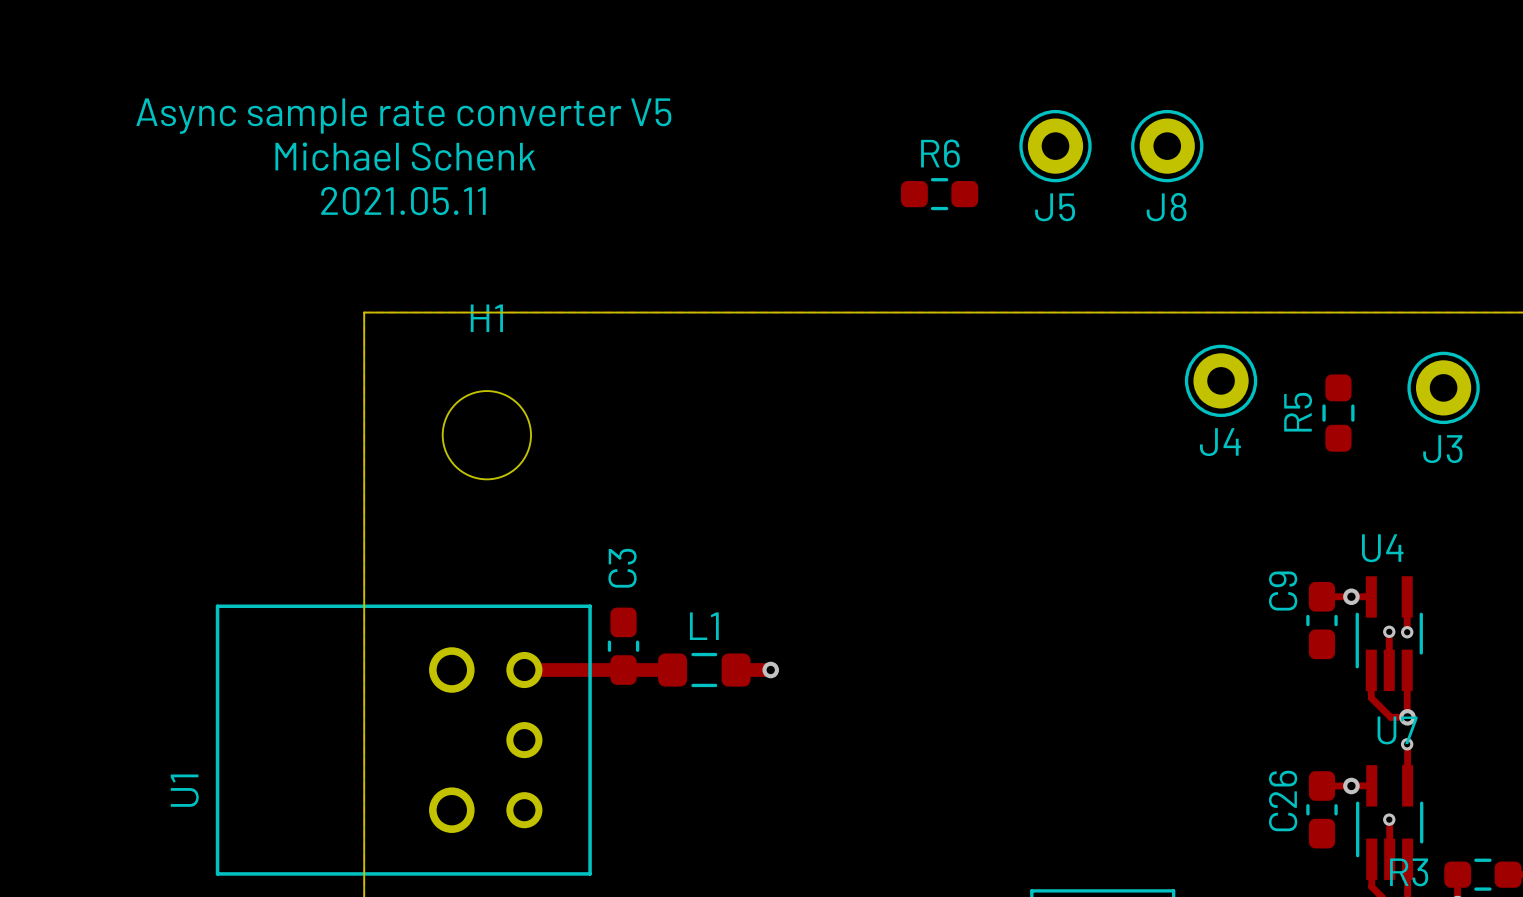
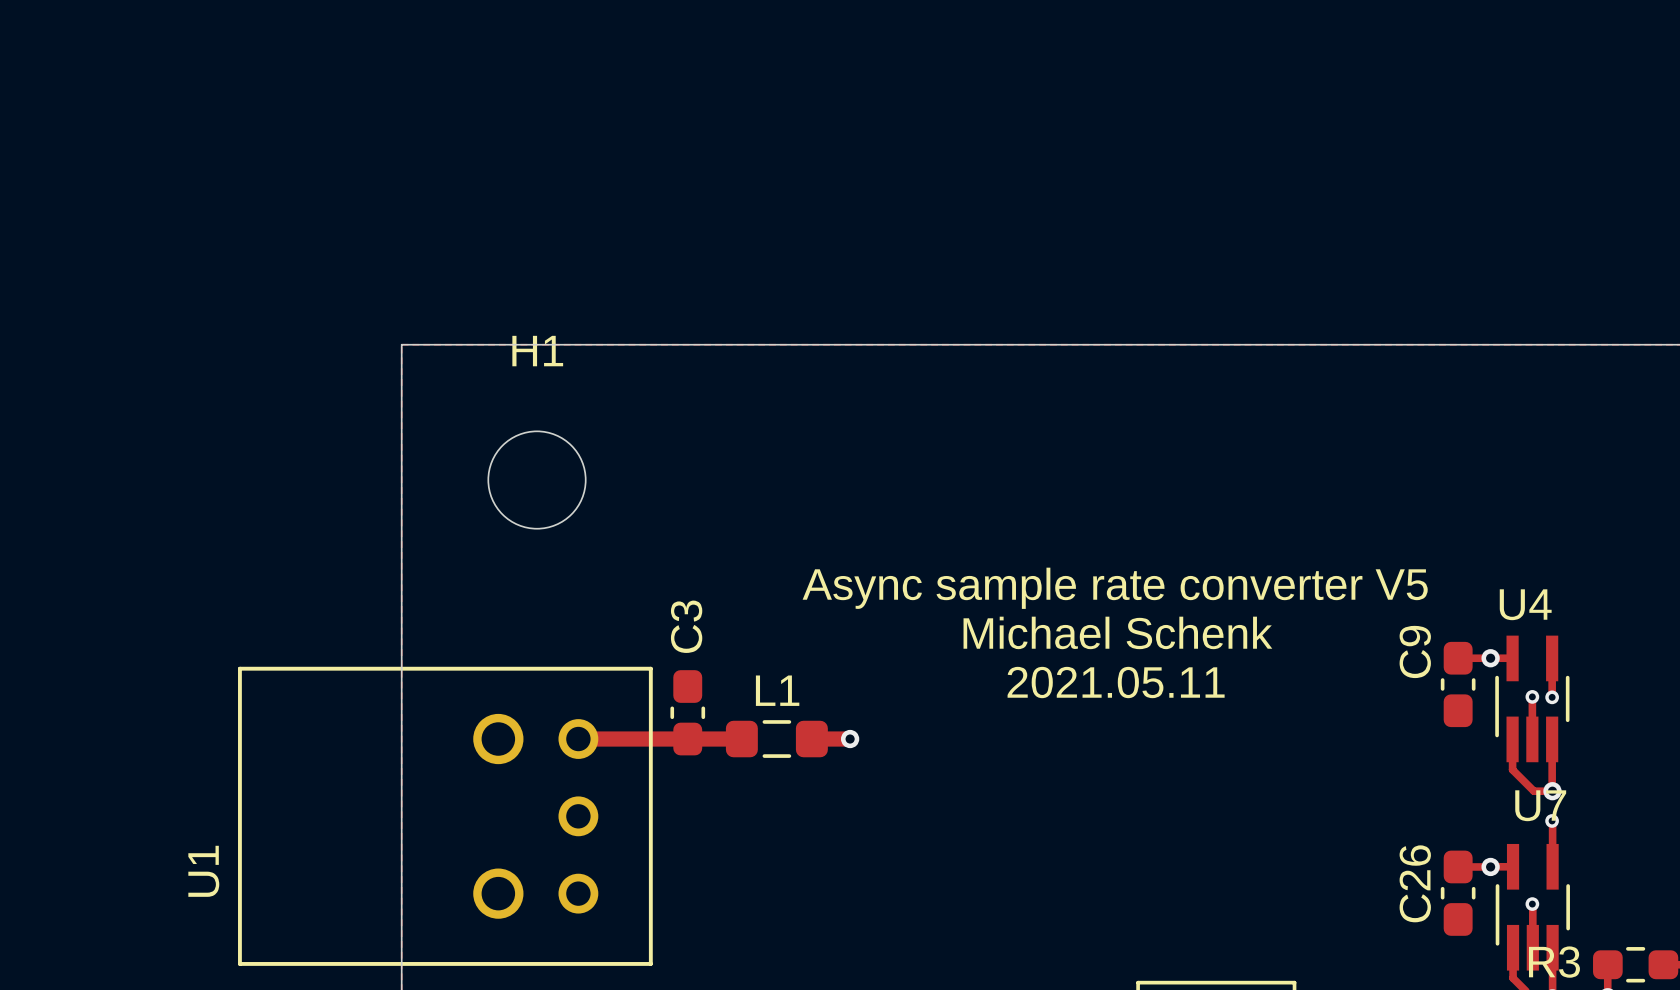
text: Async sample rate converter V5 (403, 116) -> none
J5: (1055, 146) -> none
J8: (1167, 146) -> none
text: Michael Schenk (405, 156) -> none
R6: (939, 194) -> none
text: 2021.05.11 (403, 201) -> none
J4: (1221, 380) -> none
J3: (1443, 387) -> none
R5: (1338, 413) -> none
text: none -> Async sample rate converter V5 (1115, 588)
text: none -> Michael Schenk (1117, 632)
text: none -> 2021.05.11 (1116, 682)

